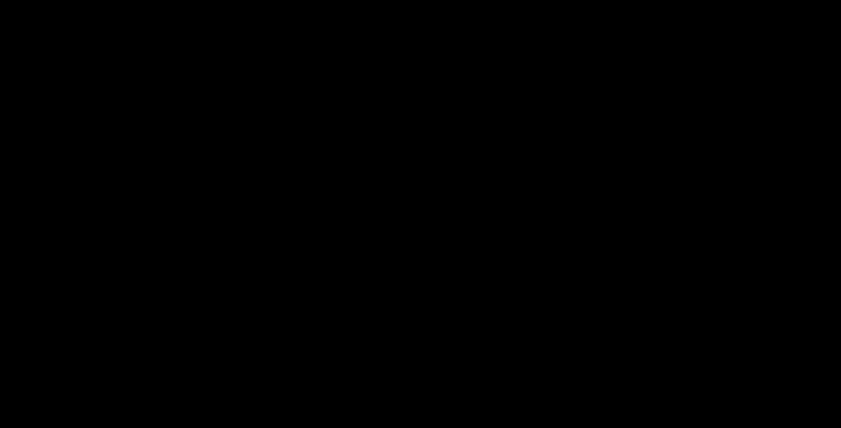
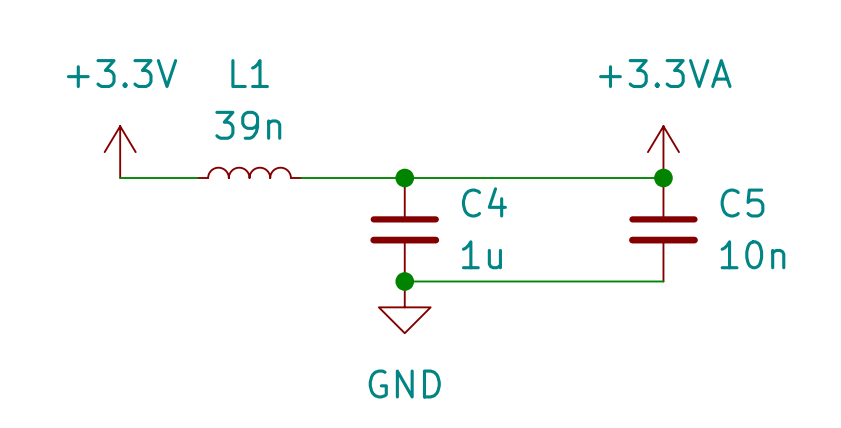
power symbol: none -> +3.3V (120, 152)
power symbol: none -> +3.3VA (663, 152)
L1: none -> 39n (249, 172)
wire: none -> (120, 178) (197, 178)
wire: none -> (301, 178) (663, 178)
junction: none -> (404, 178)
junction: none -> (663, 178)
C4: none -> 1u (404, 229)
C5: none -> 10n (663, 229)
wire: none -> (404, 281) (663, 281)
junction: none -> (404, 281)
power symbol: none -> GND (404, 307)

